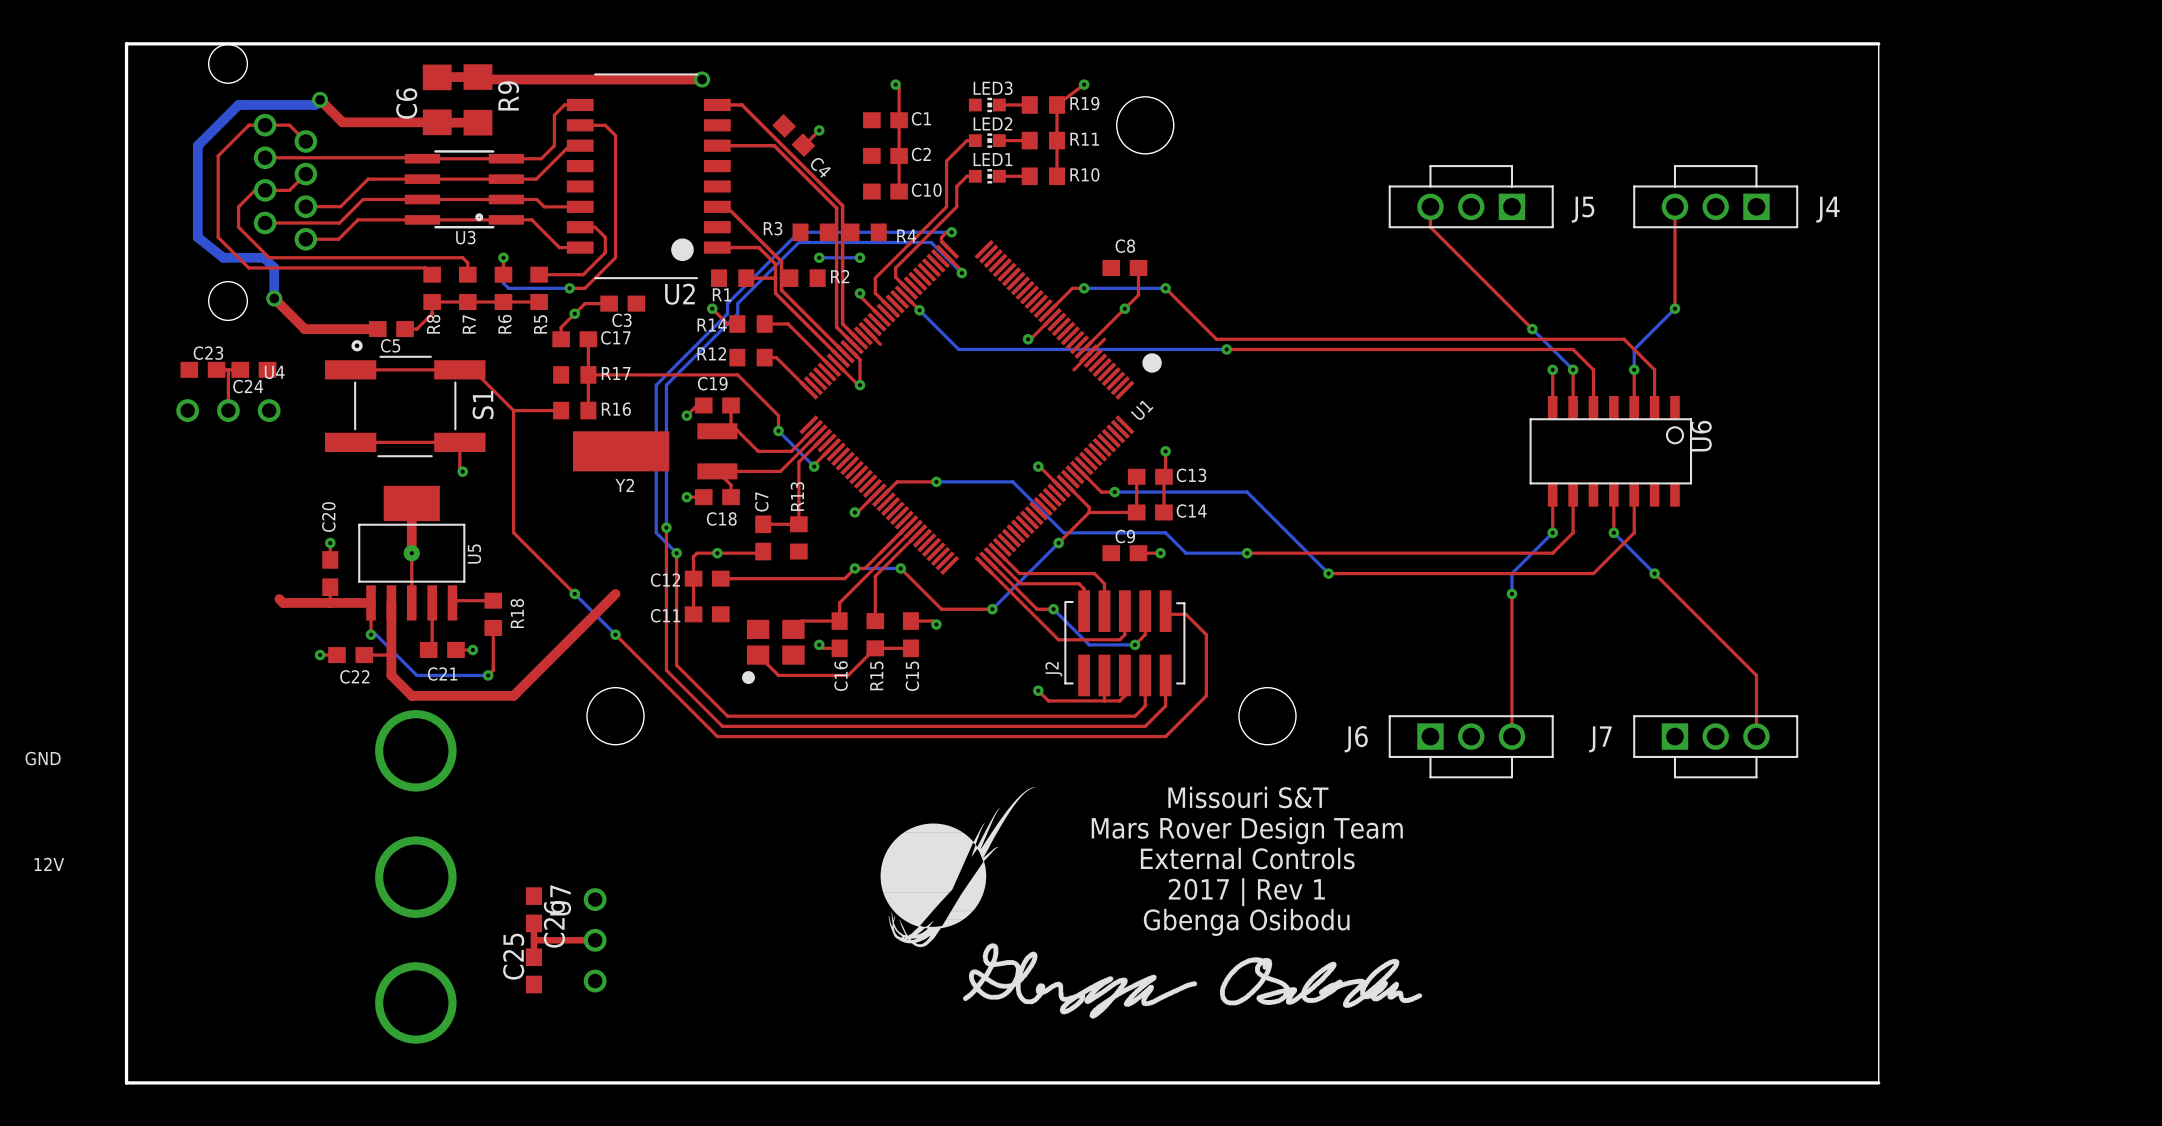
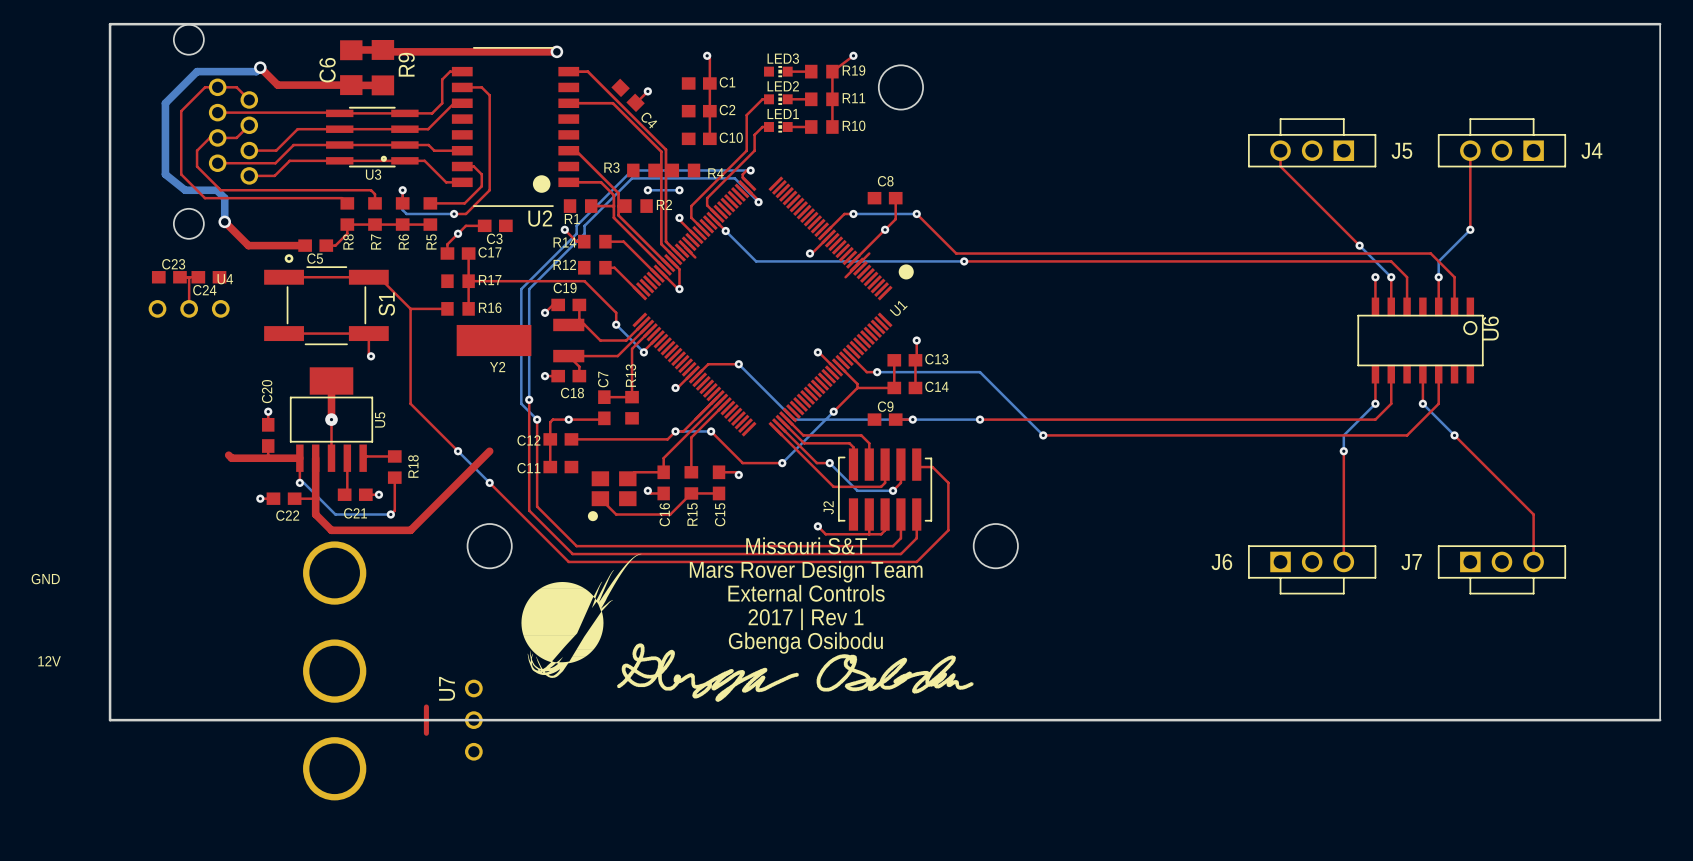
board edge: (1878, 43) (1878, 1082) (126, 1082) (126, 940) -> (1470, 24) (1660, 24) (1660, 720) (110, 720)
J5 position: (1471, 196) -> (1312, 142)
J4 position: (1715, 196) -> (1501, 142)
top track: (1430, 206) (1430, 227) (1532, 329) -> (1280, 150) (1280, 166) (1359, 245)
top track: (1674, 206) (1674, 308) -> (1470, 150) (1470, 229)
bottom track: (1674, 308) (1634, 349) (1634, 369) -> (1470, 229) (1438, 261) (1438, 277)
via: (1674, 308) -> none
via: none -> (1470, 229)
bottom track: (1532, 329) (1573, 369) -> (1359, 245) (1391, 277)
via: (1532, 329) -> none
via: none -> (1359, 245)
top track: (1624, 339) (1654, 369) (1654, 408) -> (1272, 253) (1430, 253) (1454, 277) (1454, 306)
top track: (1573, 349) (1593, 369) (1593, 408) -> (1233, 261) (1391, 261) (1407, 277) (1407, 306)
top track: (1552, 369) (1552, 408) -> (1375, 277) (1375, 306)
via: (1552, 369) -> none
top track: (1573, 369) (1573, 408) -> (1391, 277) (1391, 306)
via: (1573, 369) -> none
top track: (1634, 369) (1634, 408) -> (1438, 277) (1438, 306)
via: (1634, 369) -> none
via: none -> (1375, 277)
via: none -> (1391, 277)
via: none -> (1438, 277)
U6 position: (1610, 451) -> (1420, 340)
bottom track: (936, 481) (1012, 481) (1063, 532) (1165, 532) (1185, 553) -> (738, 364) (794, 419) (932, 419)
top track: (1552, 494) (1552, 532) -> (1375, 374) (1375, 403)
top track: (1573, 494) (1573, 532) (1552, 553) -> (1391, 374) (1391, 403) (1375, 419) (1217, 419)
top track: (1613, 494) (1613, 532) -> (1422, 374) (1422, 403)
top track: (1634, 494) (1634, 532) (1593, 573) -> (1438, 374) (1438, 403) (1407, 435) (1248, 435)
bottom track: (1552, 532) (1511, 573) (1511, 593) -> (1375, 403) (1343, 435) (1343, 451)
via: (1552, 532) -> none
bottom track: (1613, 532) (1654, 573) -> (1422, 403) (1454, 435)
via: (1613, 532) -> none
via: none -> (1375, 403)
via: none -> (1422, 403)
top track: (1654, 573) (1756, 675) (1756, 736) -> (1454, 435) (1533, 514) (1533, 561)
via: (1654, 573) -> none
via: none -> (1454, 435)
top track: (1511, 593) (1511, 736) -> (1343, 451) (1343, 561)
via: (1511, 593) -> none
via: none -> (1343, 451)
J6 position: (1471, 746) -> (1312, 569)
J7 position: (1715, 746) -> (1501, 569)
text position: Missouri S&T (1248, 797) -> Missouri S&T (806, 545)
text position: Mars Rover Design Team (1247, 830) -> Mars Rover Design Team (806, 571)
text position: External Controls (1247, 858) -> External Controls (806, 593)
drawing position: (958, 867) -> (581, 615)
text position: 2017 | Rev 1 (1246, 892) -> 2017 | Rev 1 (806, 619)
C26: (534, 909) -> none
text position: Gbenga Osibodu (1246, 922) -> Gbenga Osibodu (805, 643)
top track: (534, 940) (595, 940) -> none
C25: (534, 970) -> none
drawing position: (1192, 981) -> (795, 672)

